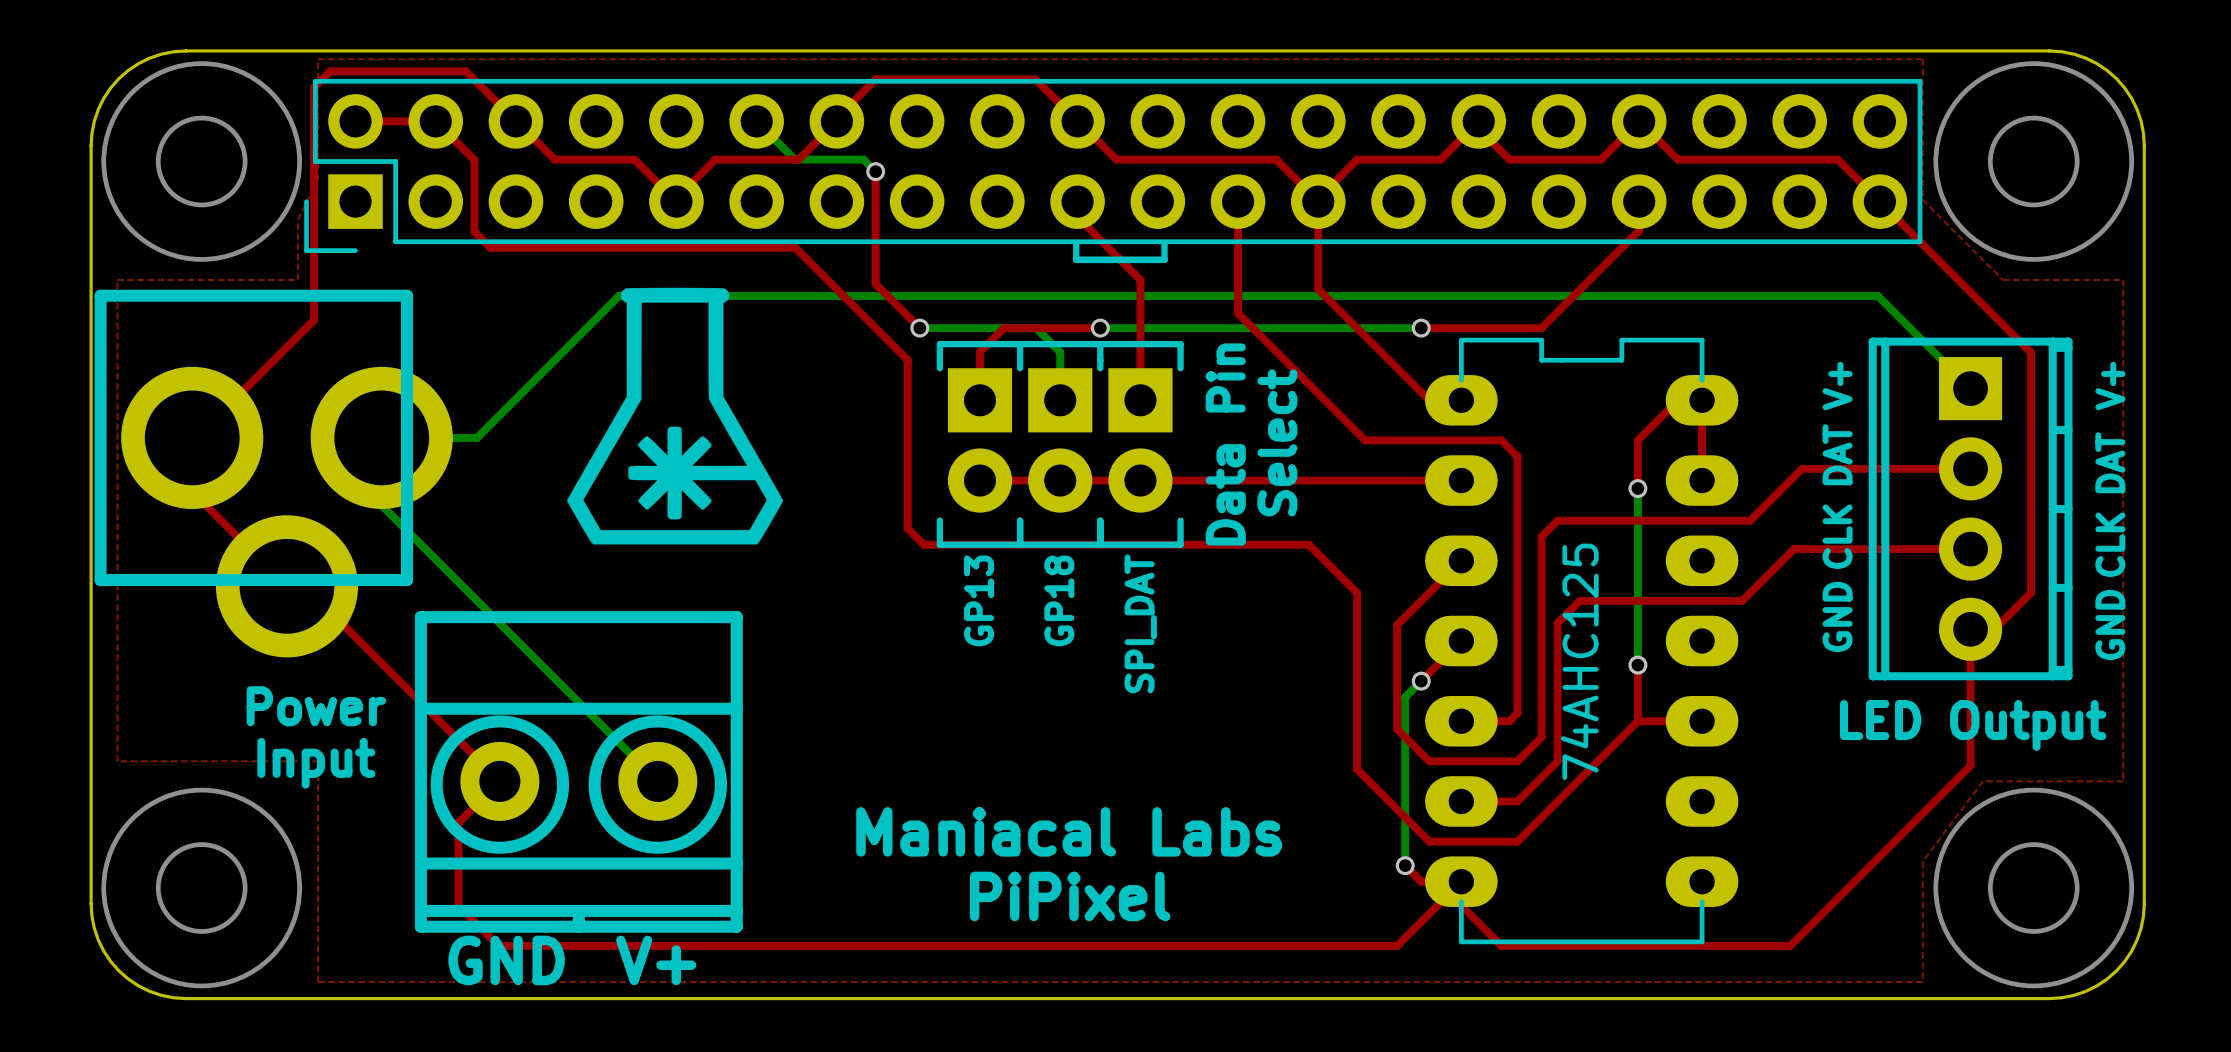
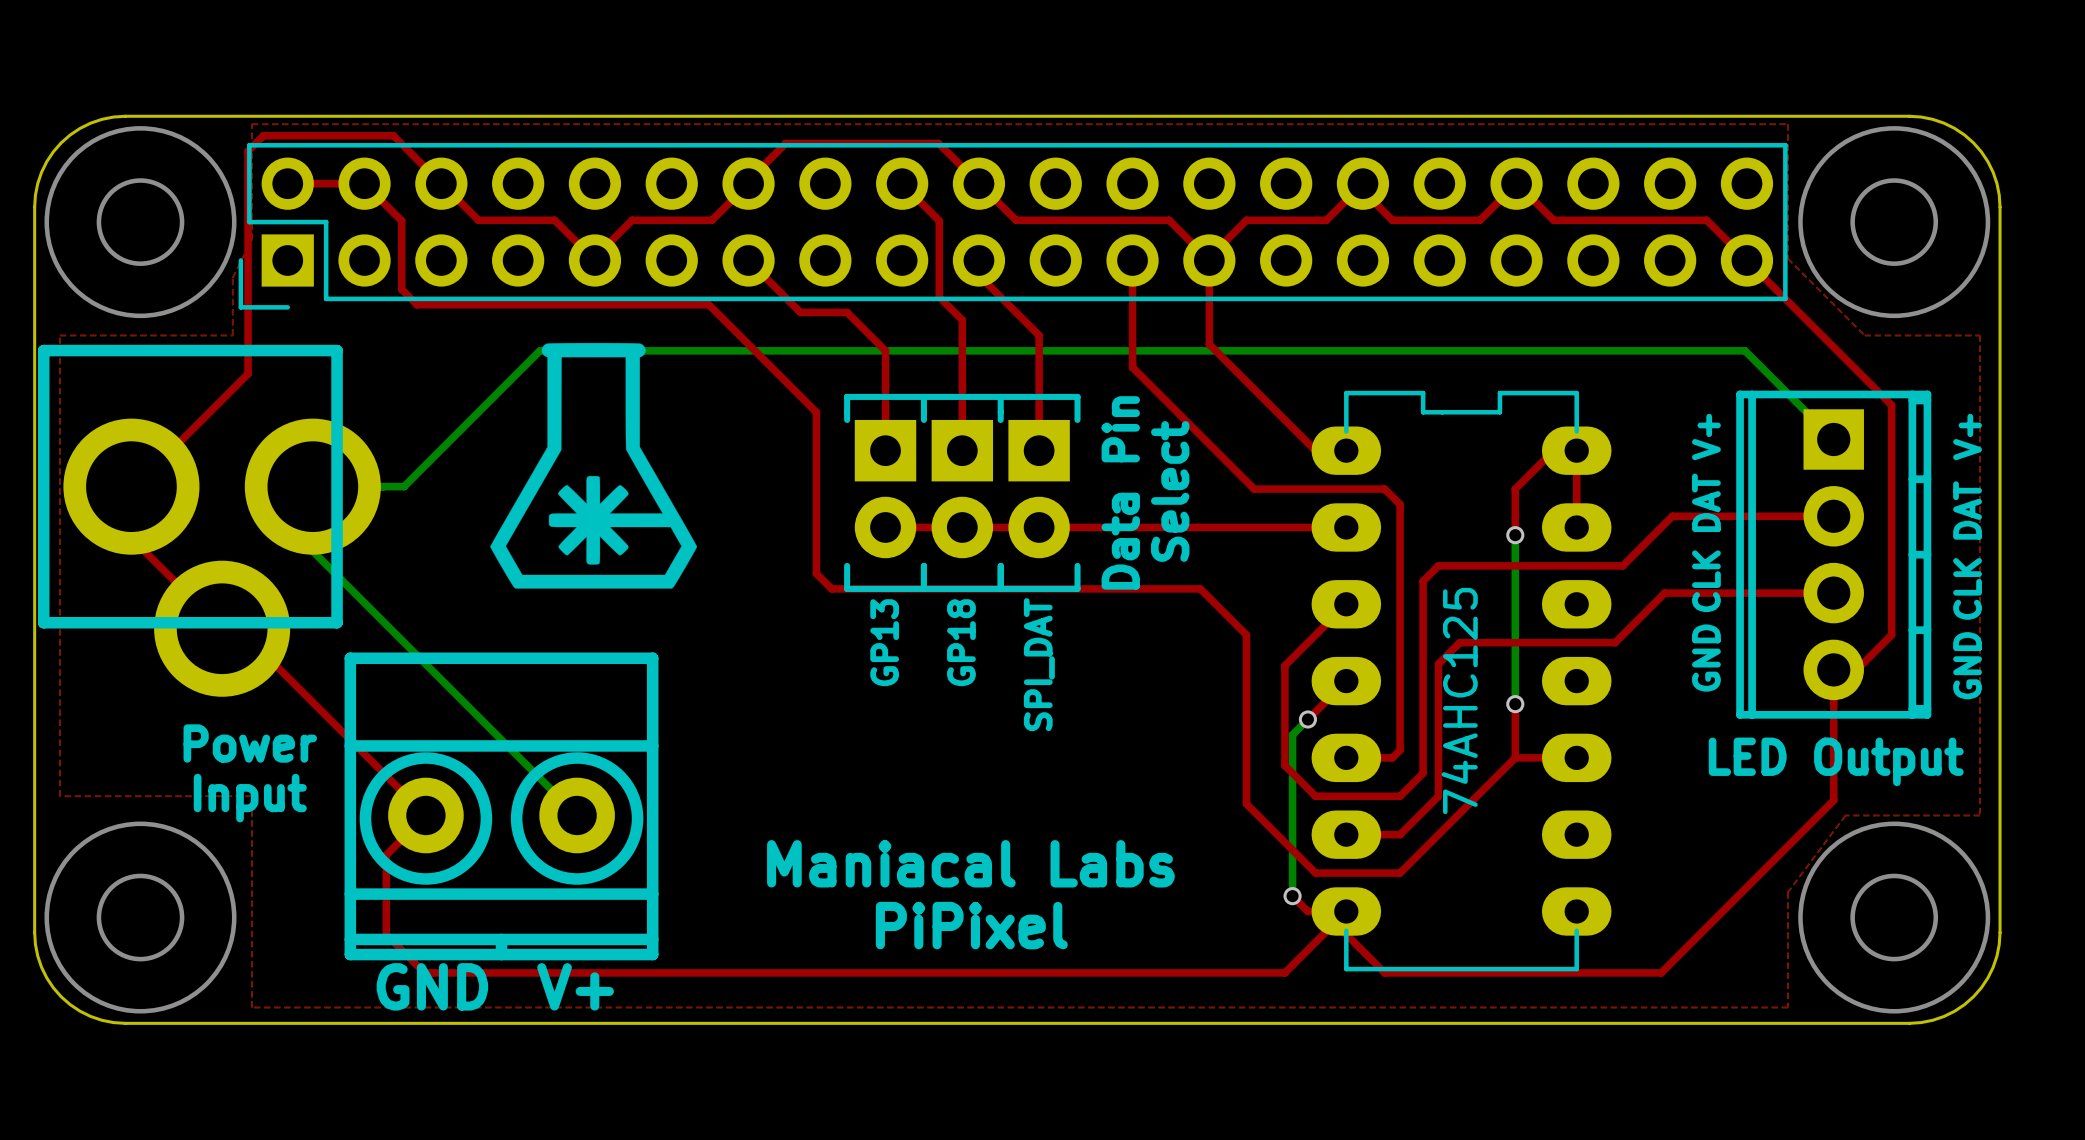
bottom track: (756, 121) (794, 159) (863, 159) (875, 171) -> none
top track: none -> (902, 183) (939, 220) (939, 297) (962, 320) (962, 450)
top track: (875, 171) (875, 283) (919, 328) -> none
via: (875, 171) -> none
top track: (1639, 201) (1639, 230) (1541, 328) (1421, 328) -> none
line: (1076, 243) (1076, 259) (1164, 259) (1164, 243) -> none
bottom track: (919, 328) (1036, 328) (1060, 352) (1060, 400) -> none
via: (919, 328) -> none
bottom track: (1100, 328) (1421, 328) -> none
top track: (1100, 328) (1004, 328) (979, 352) -> (748, 260) (800, 312) (847, 312) (885, 350) (885, 404)
via: (1100, 328) -> none
via: (1421, 328) -> none

